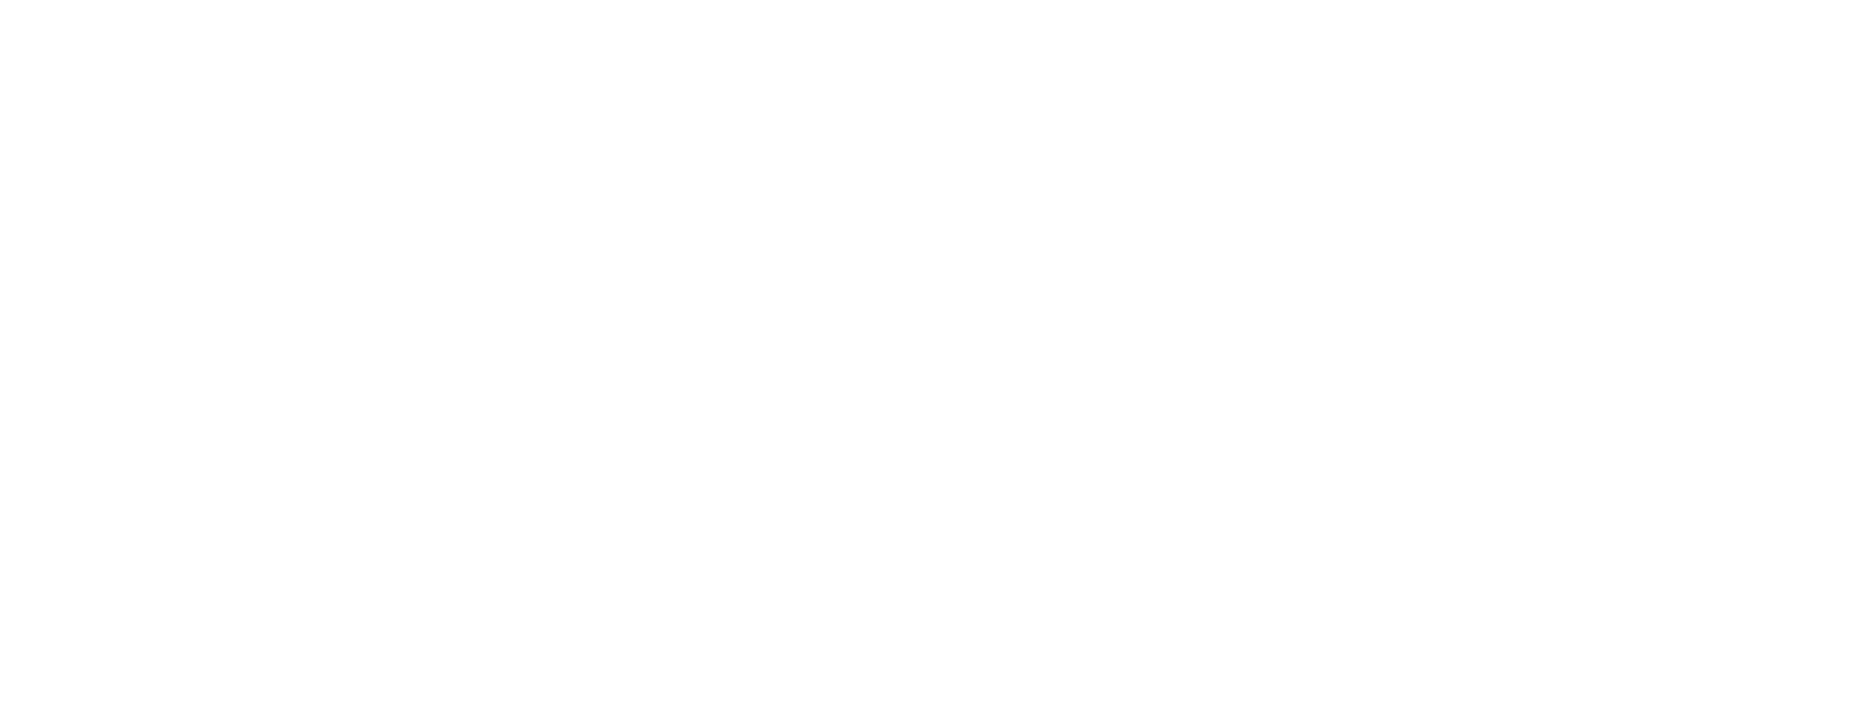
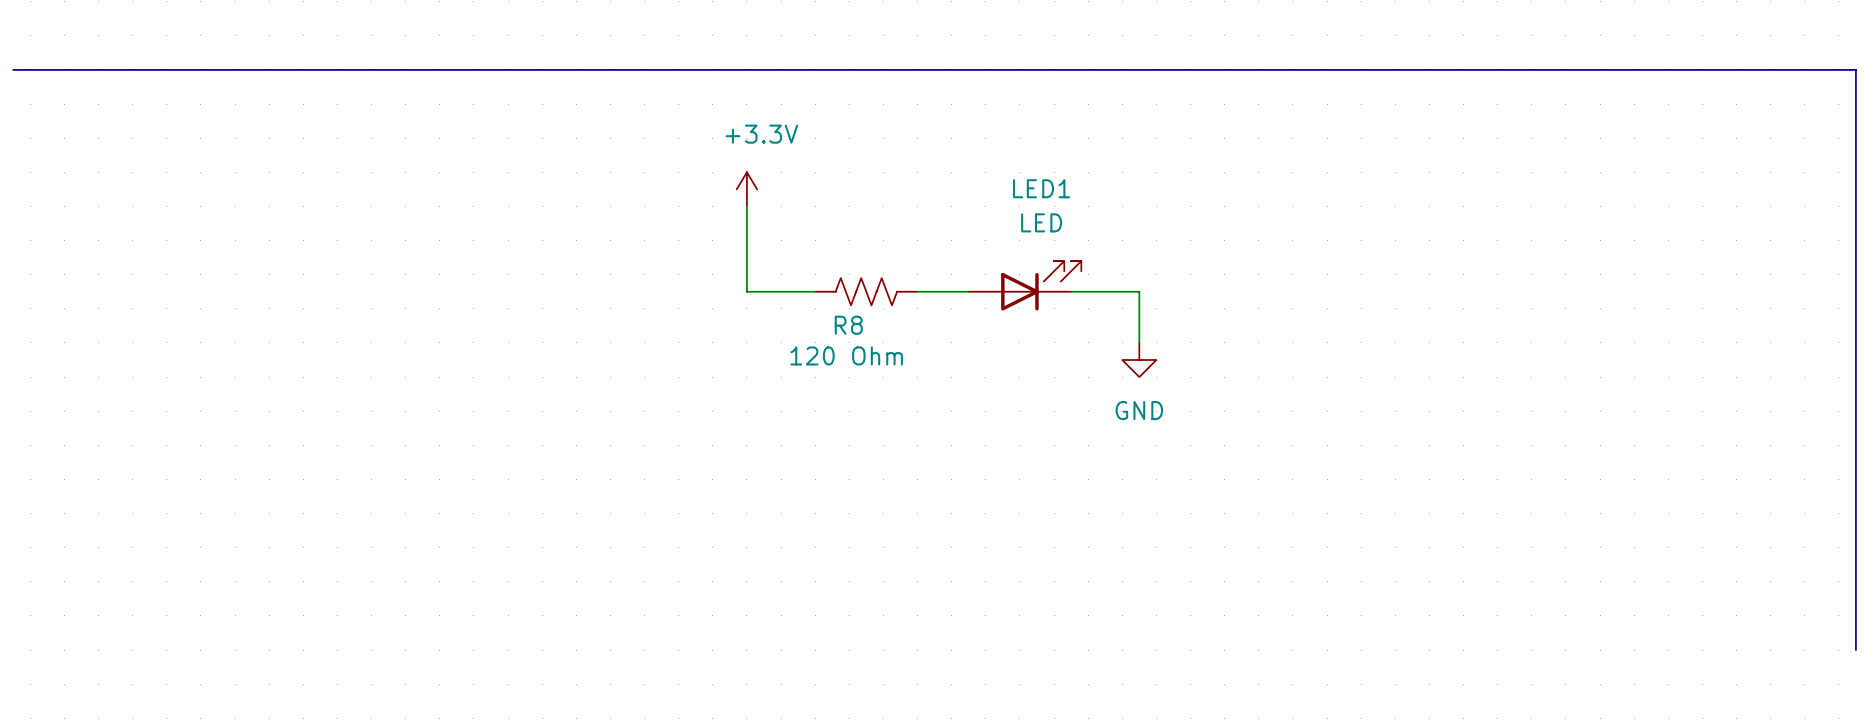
line: none -> (13, 69) (1855, 69) (1855, 650)
power symbol: none -> +3.3V (746, 189)
wire: none -> (746, 206) (746, 291) (815, 291)
LED1: none -> LED (1025, 285)
R8: none -> 120 Ohm (866, 291)
wire: none -> (917, 291) (968, 291)
wire: none -> (1071, 291) (1139, 291) (1139, 342)
power symbol: none -> GND (1139, 359)

